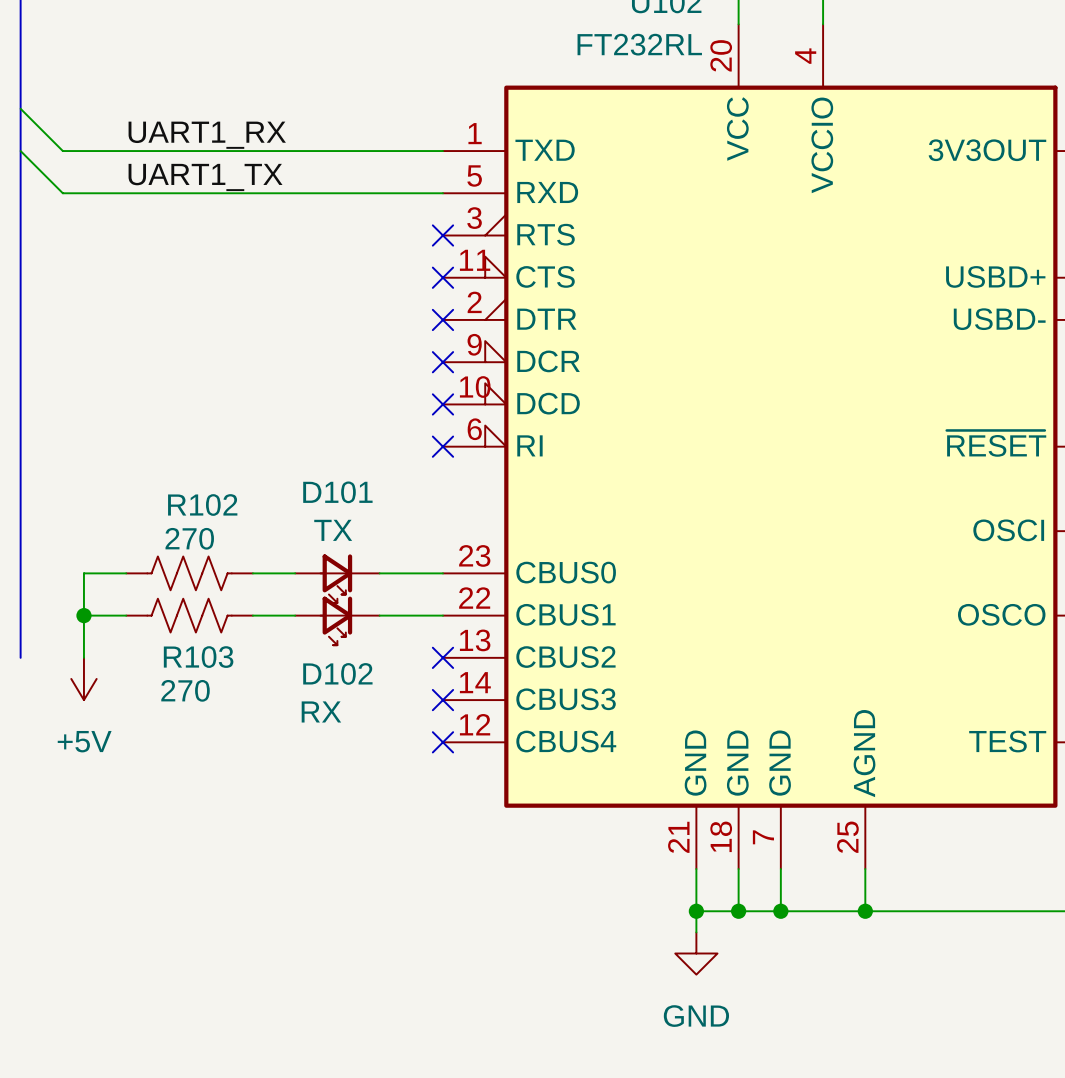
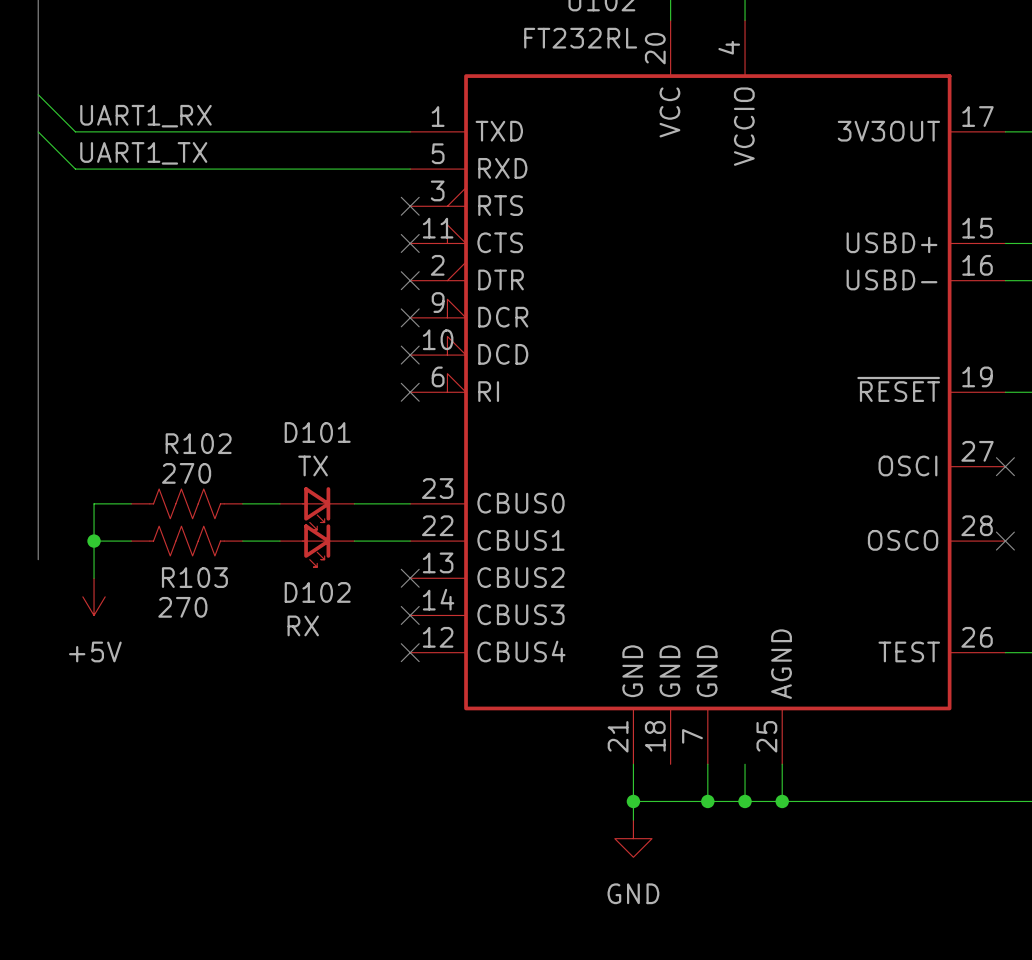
label position: UART1_RX (207, 135) -> UART1_RX (145, 116)
label position: UART1_TX (205, 177) -> UART1_TX (143, 153)
bus: (20, 636) (20, 657) -> none
wire: (738, 869) (738, 911) -> (745, 764) (745, 801)
junction position: (738, 911) -> (745, 801)

